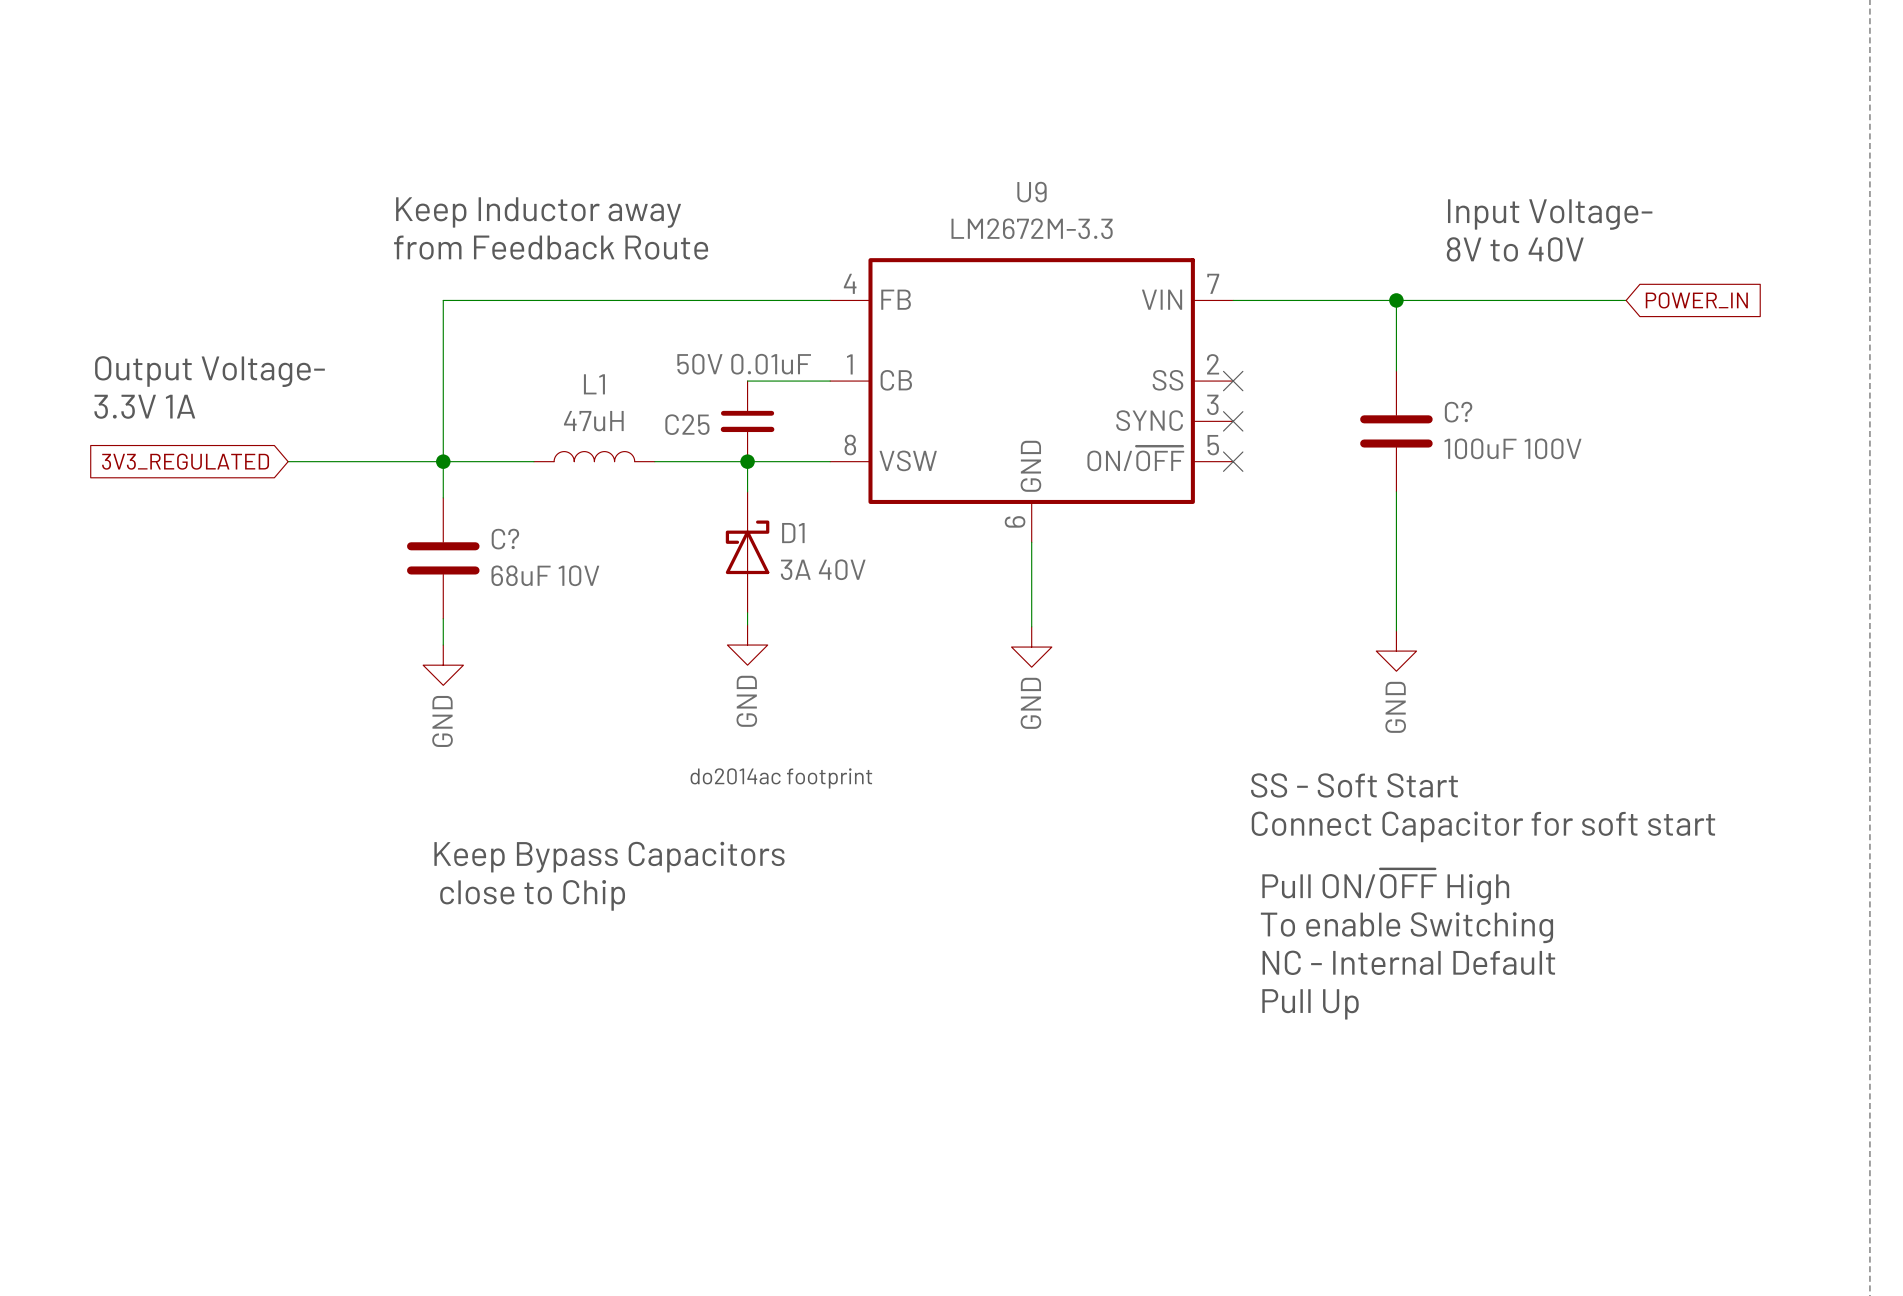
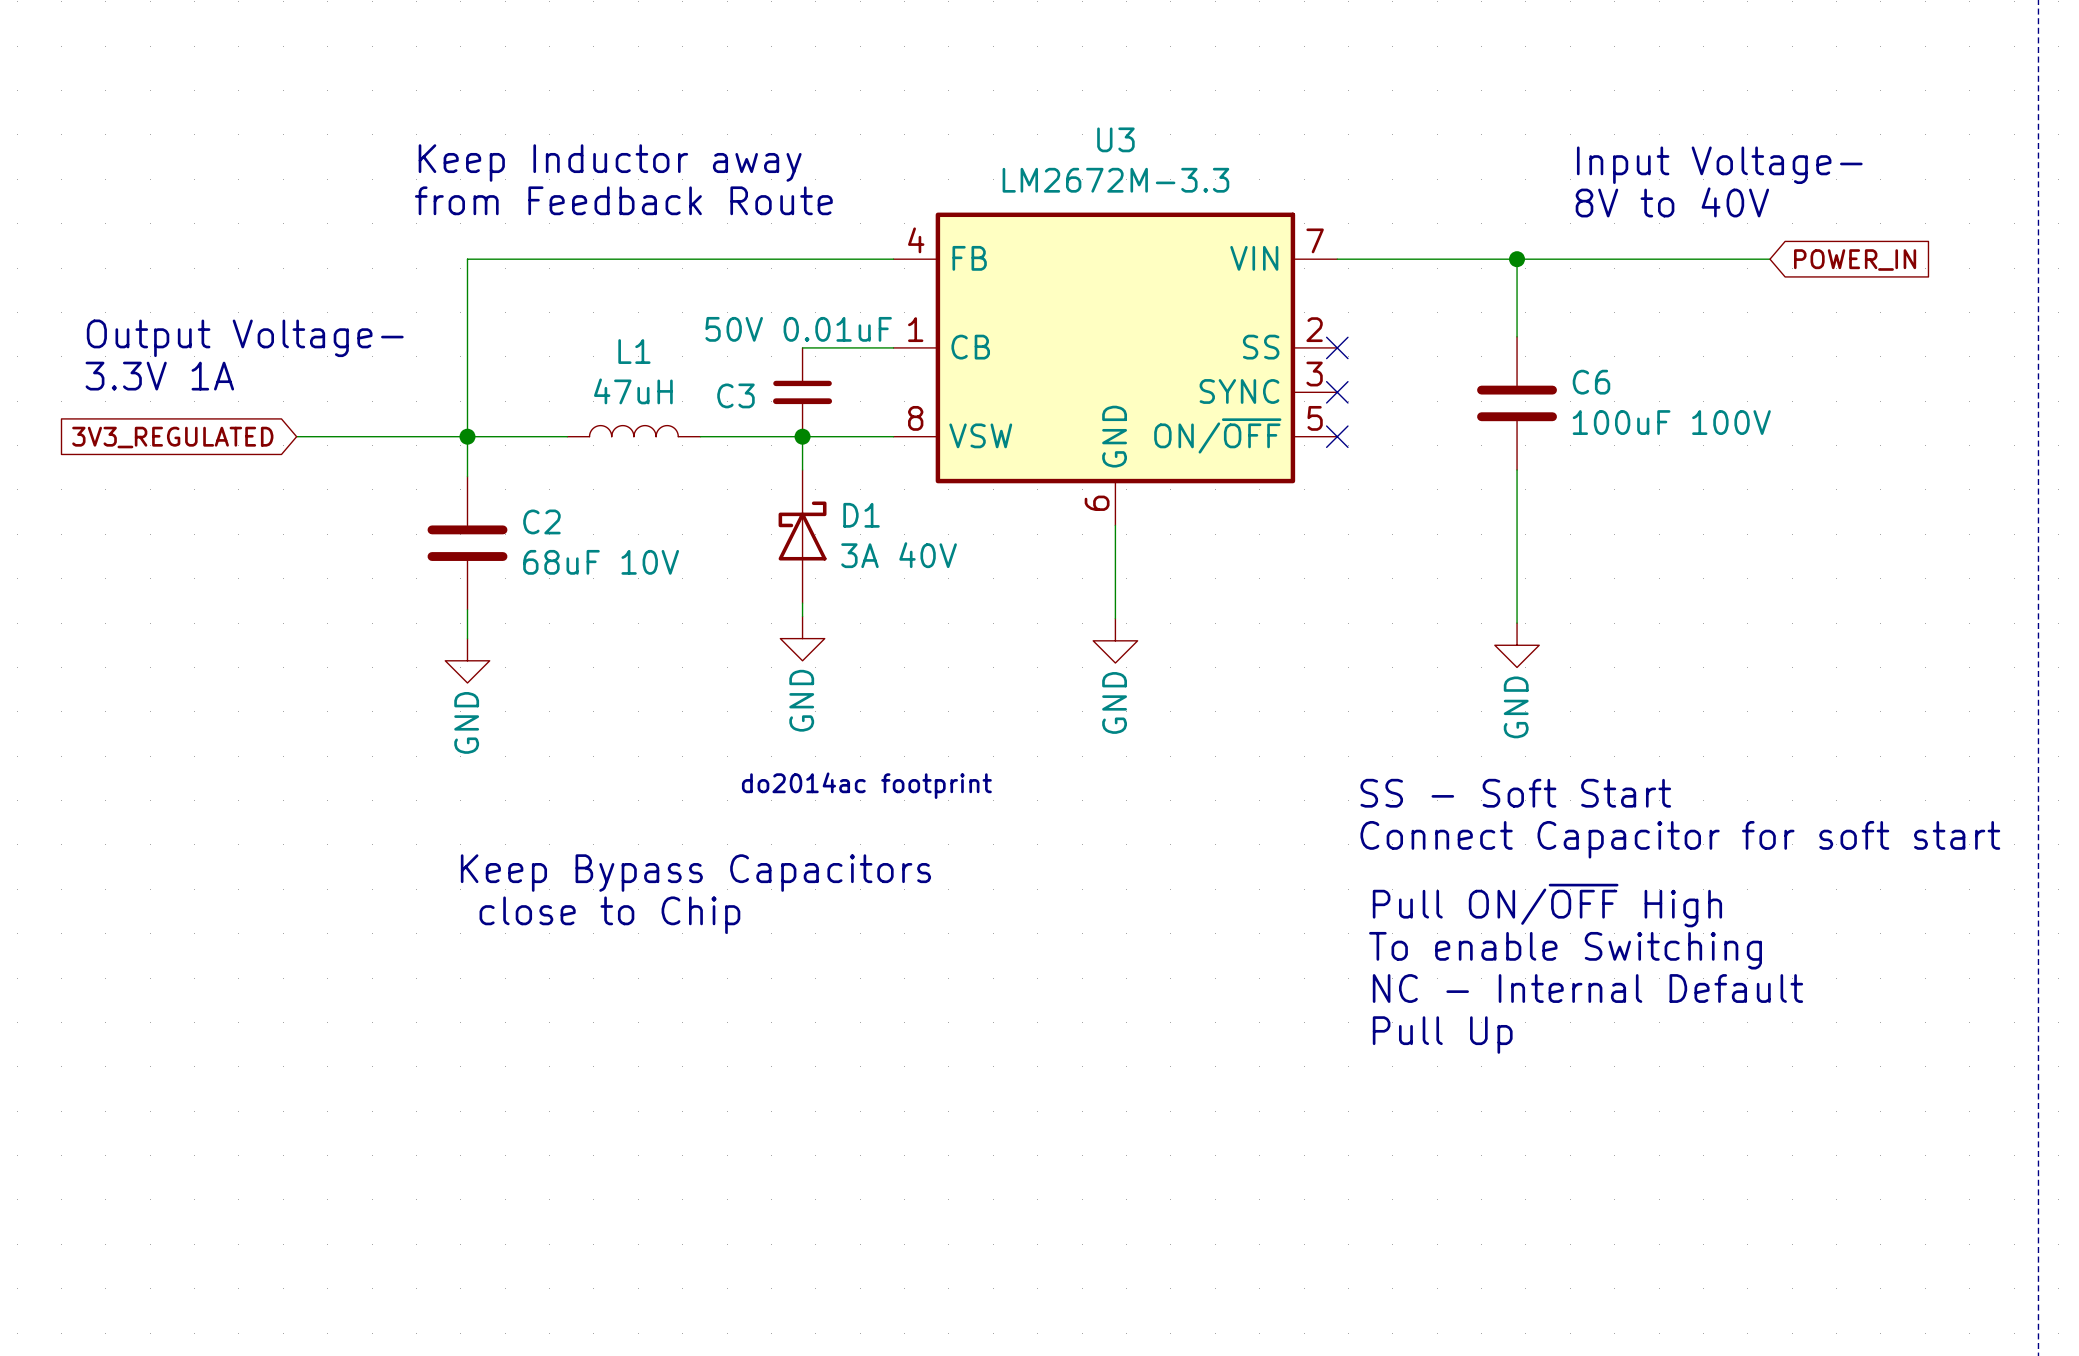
U9 name: U9 (1031, 192) -> U3 (1115, 139)
C? name: C? (1458, 412) -> C6 (1591, 382)
C25 name: C25 (687, 424) -> C3 (735, 395)
C? name: C? (505, 539) -> C2 (541, 521)

